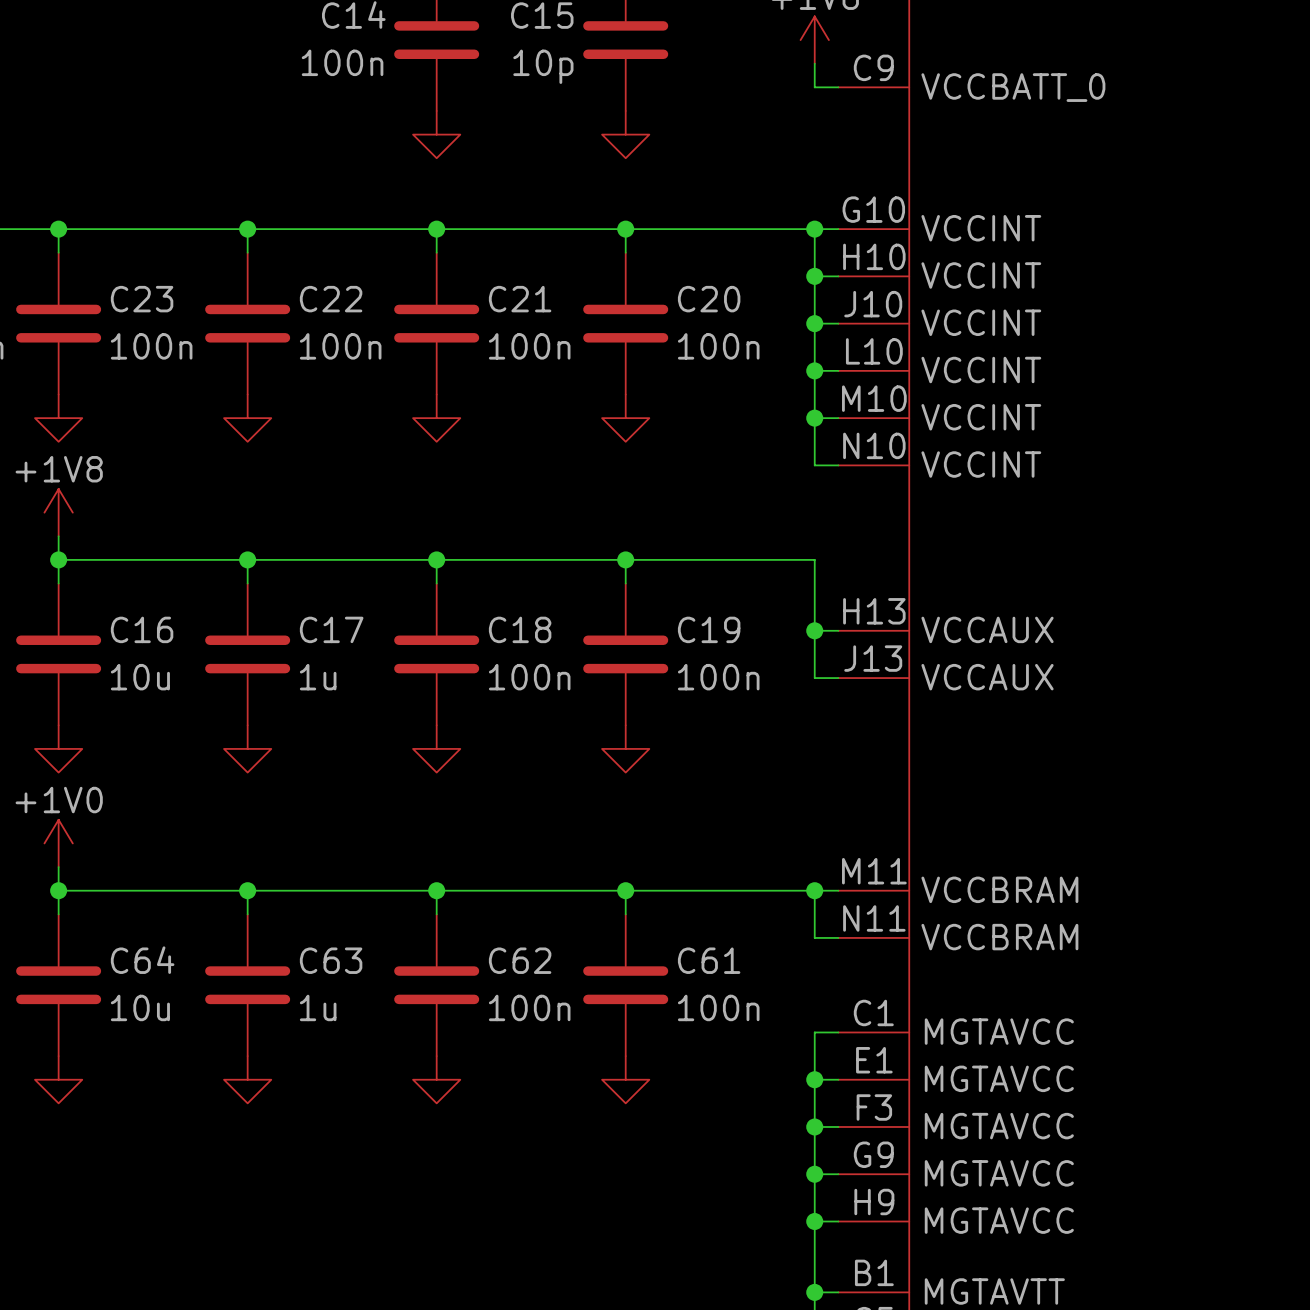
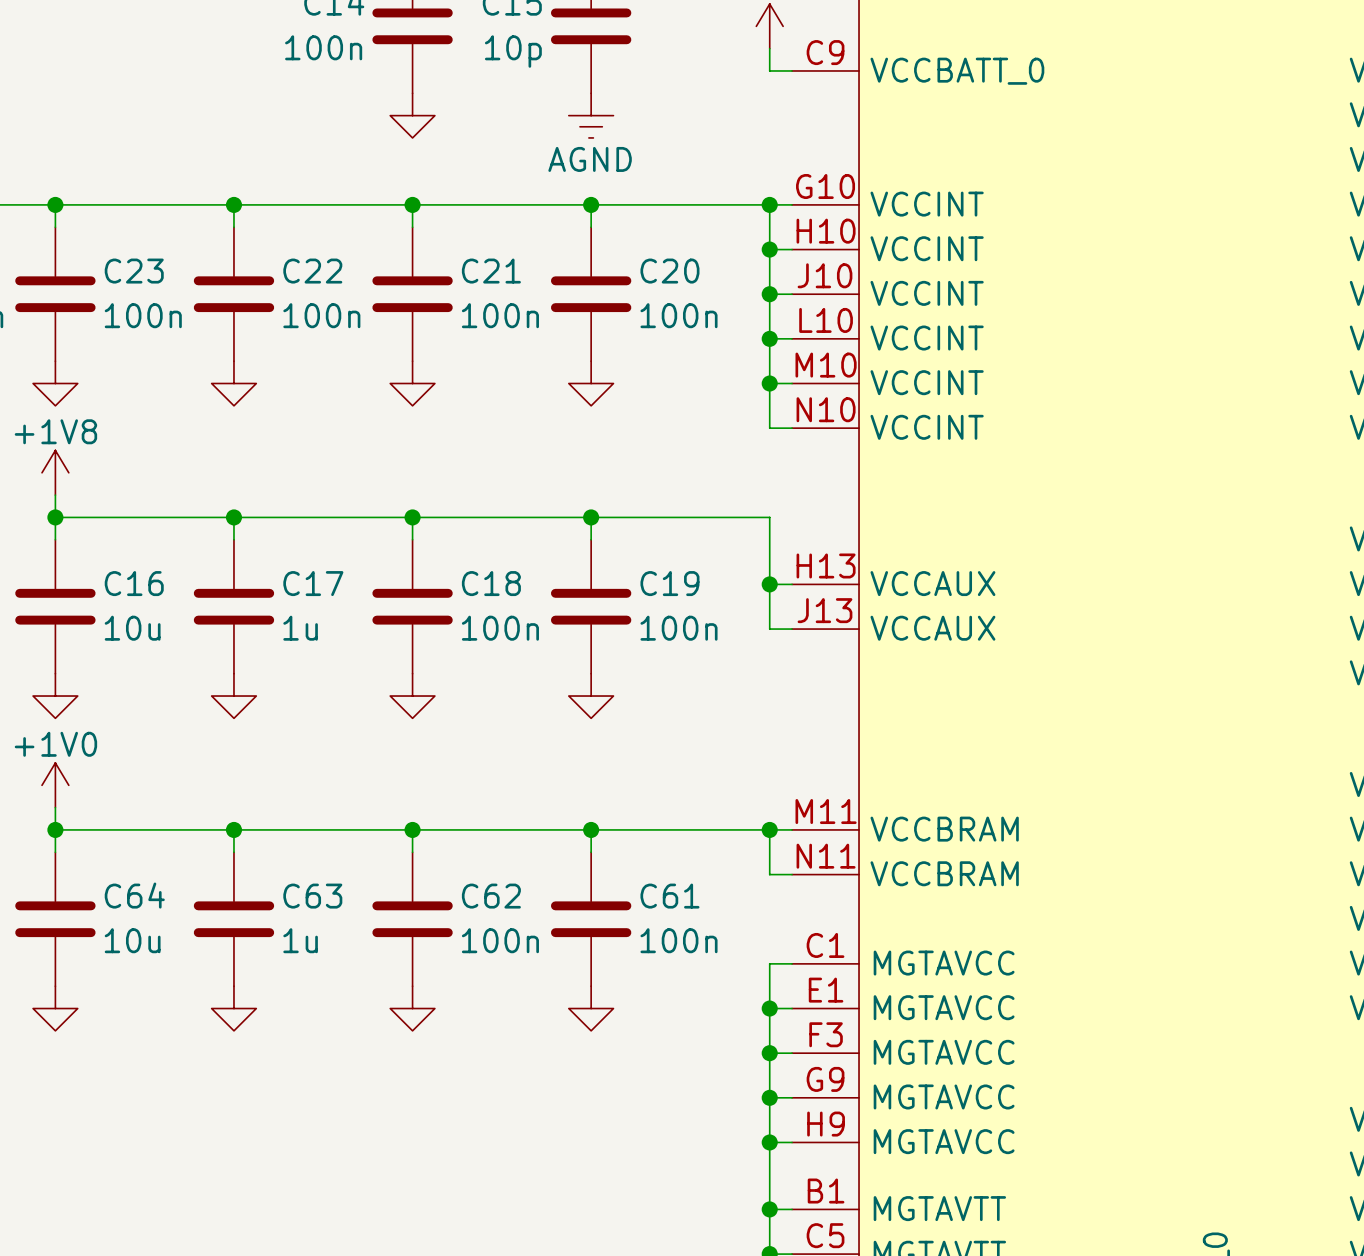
power symbol shape: [602, 110, 650, 159] -> [568, 93, 614, 138]
power symbol text: none -> AGND (590, 159)

